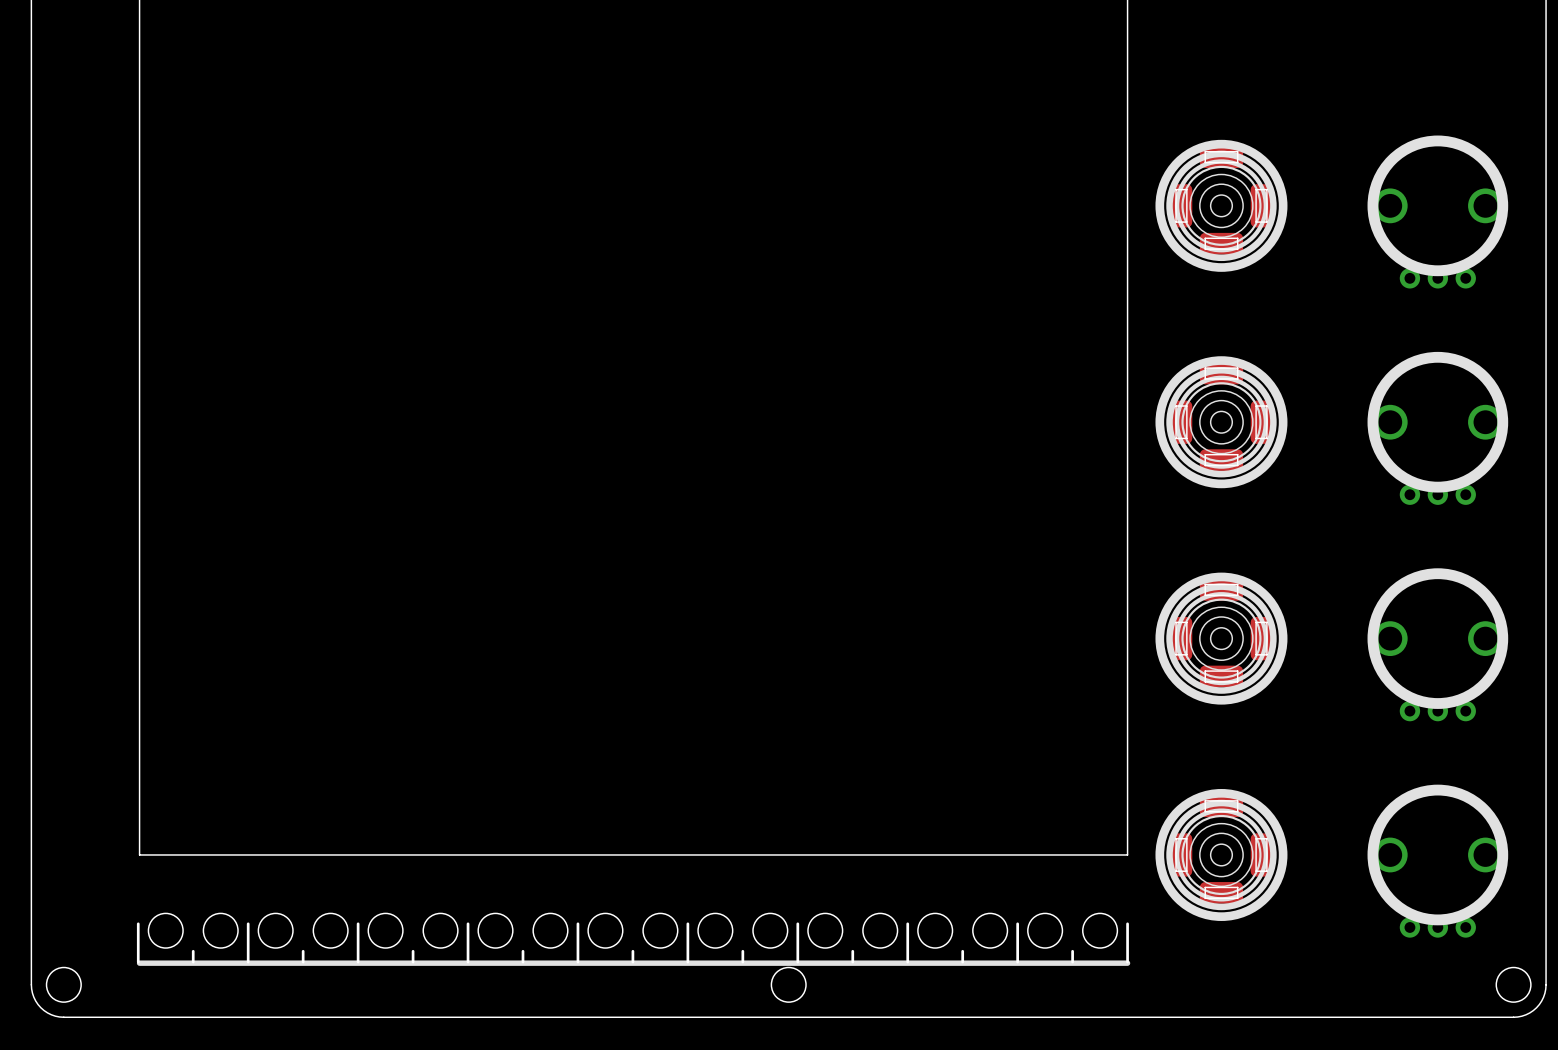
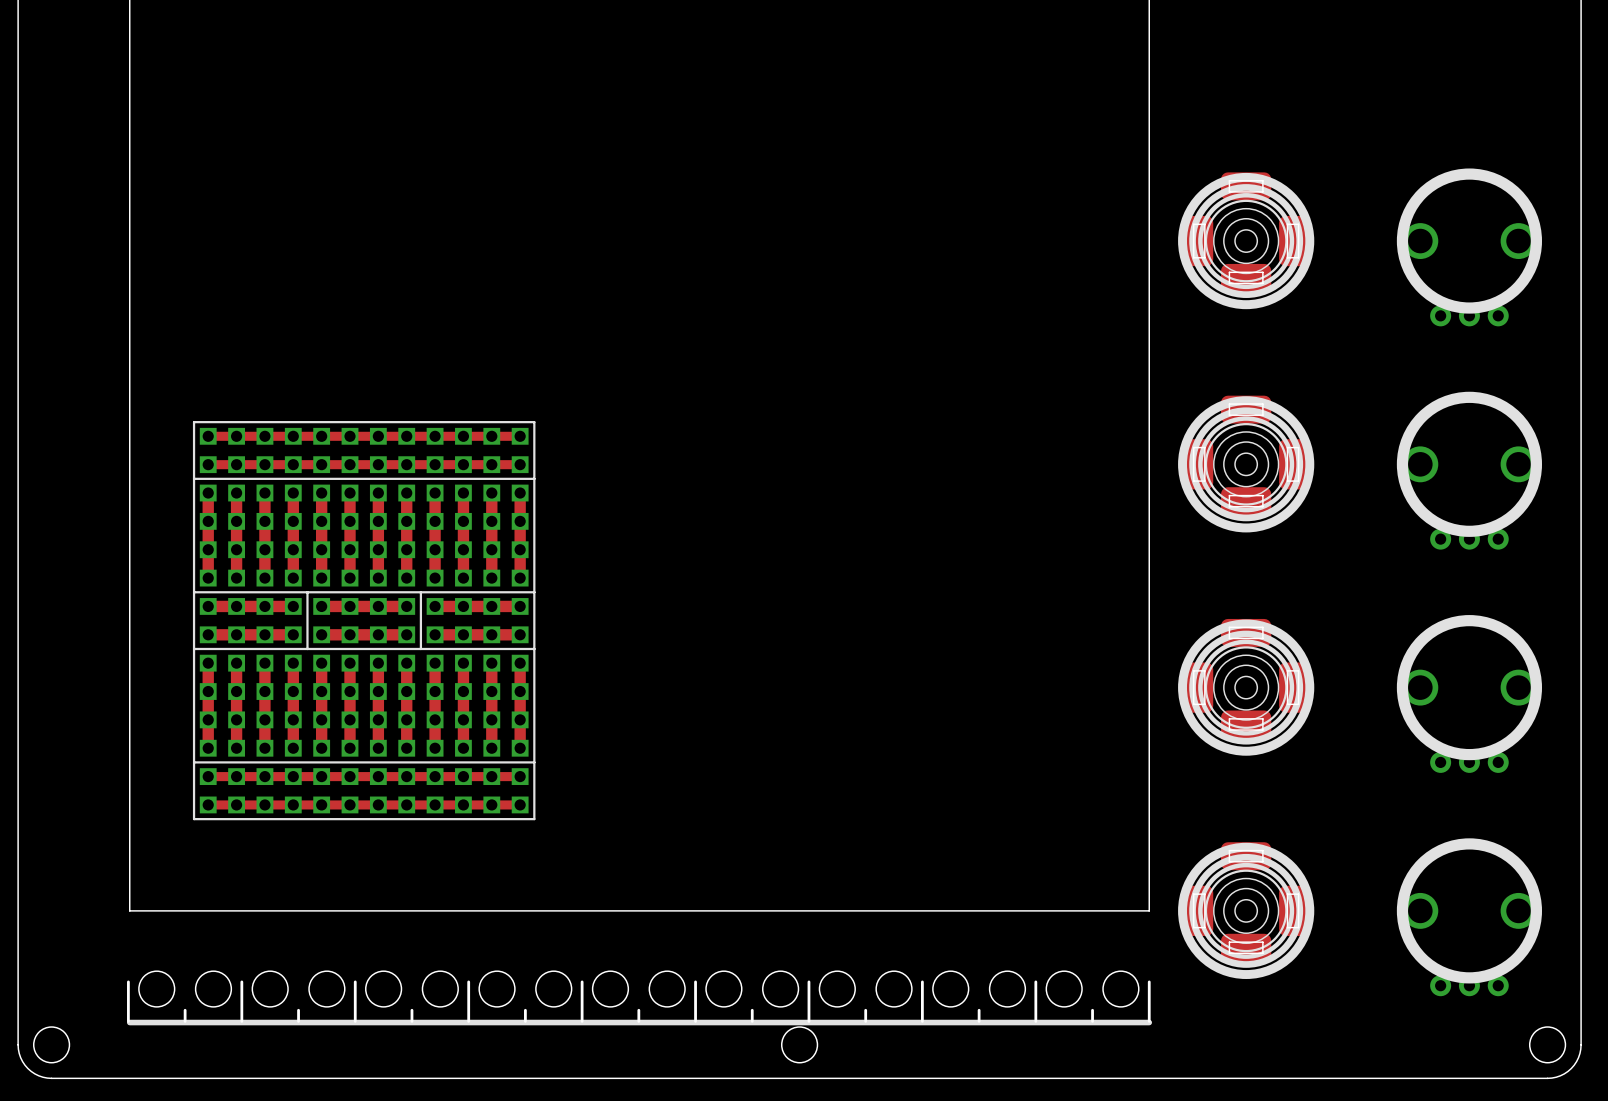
part footprint: [1155, 139, 1288, 272] -> [1178, 172, 1315, 310]
part footprint: [1155, 356, 1288, 489] -> [1178, 395, 1315, 533]
part footprint: [1155, 572, 1288, 705] -> [1178, 618, 1315, 756]
part: none -> (364, 620)
part footprint: [1155, 788, 1288, 921] -> [1178, 842, 1315, 979]

